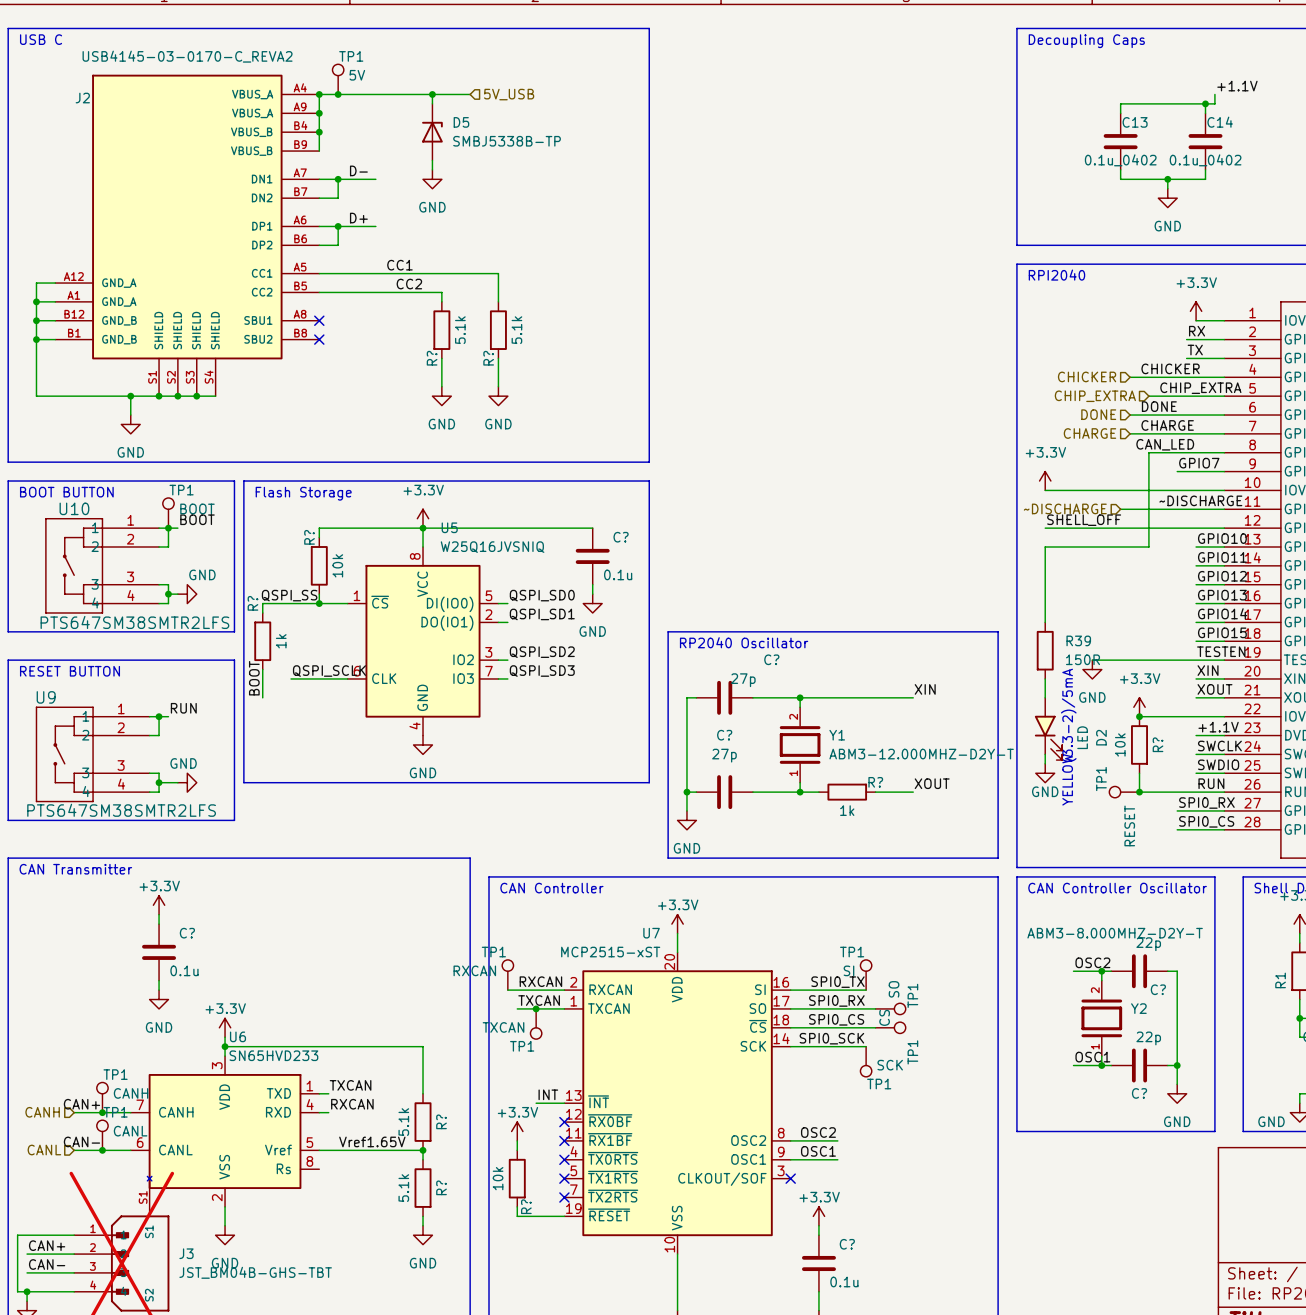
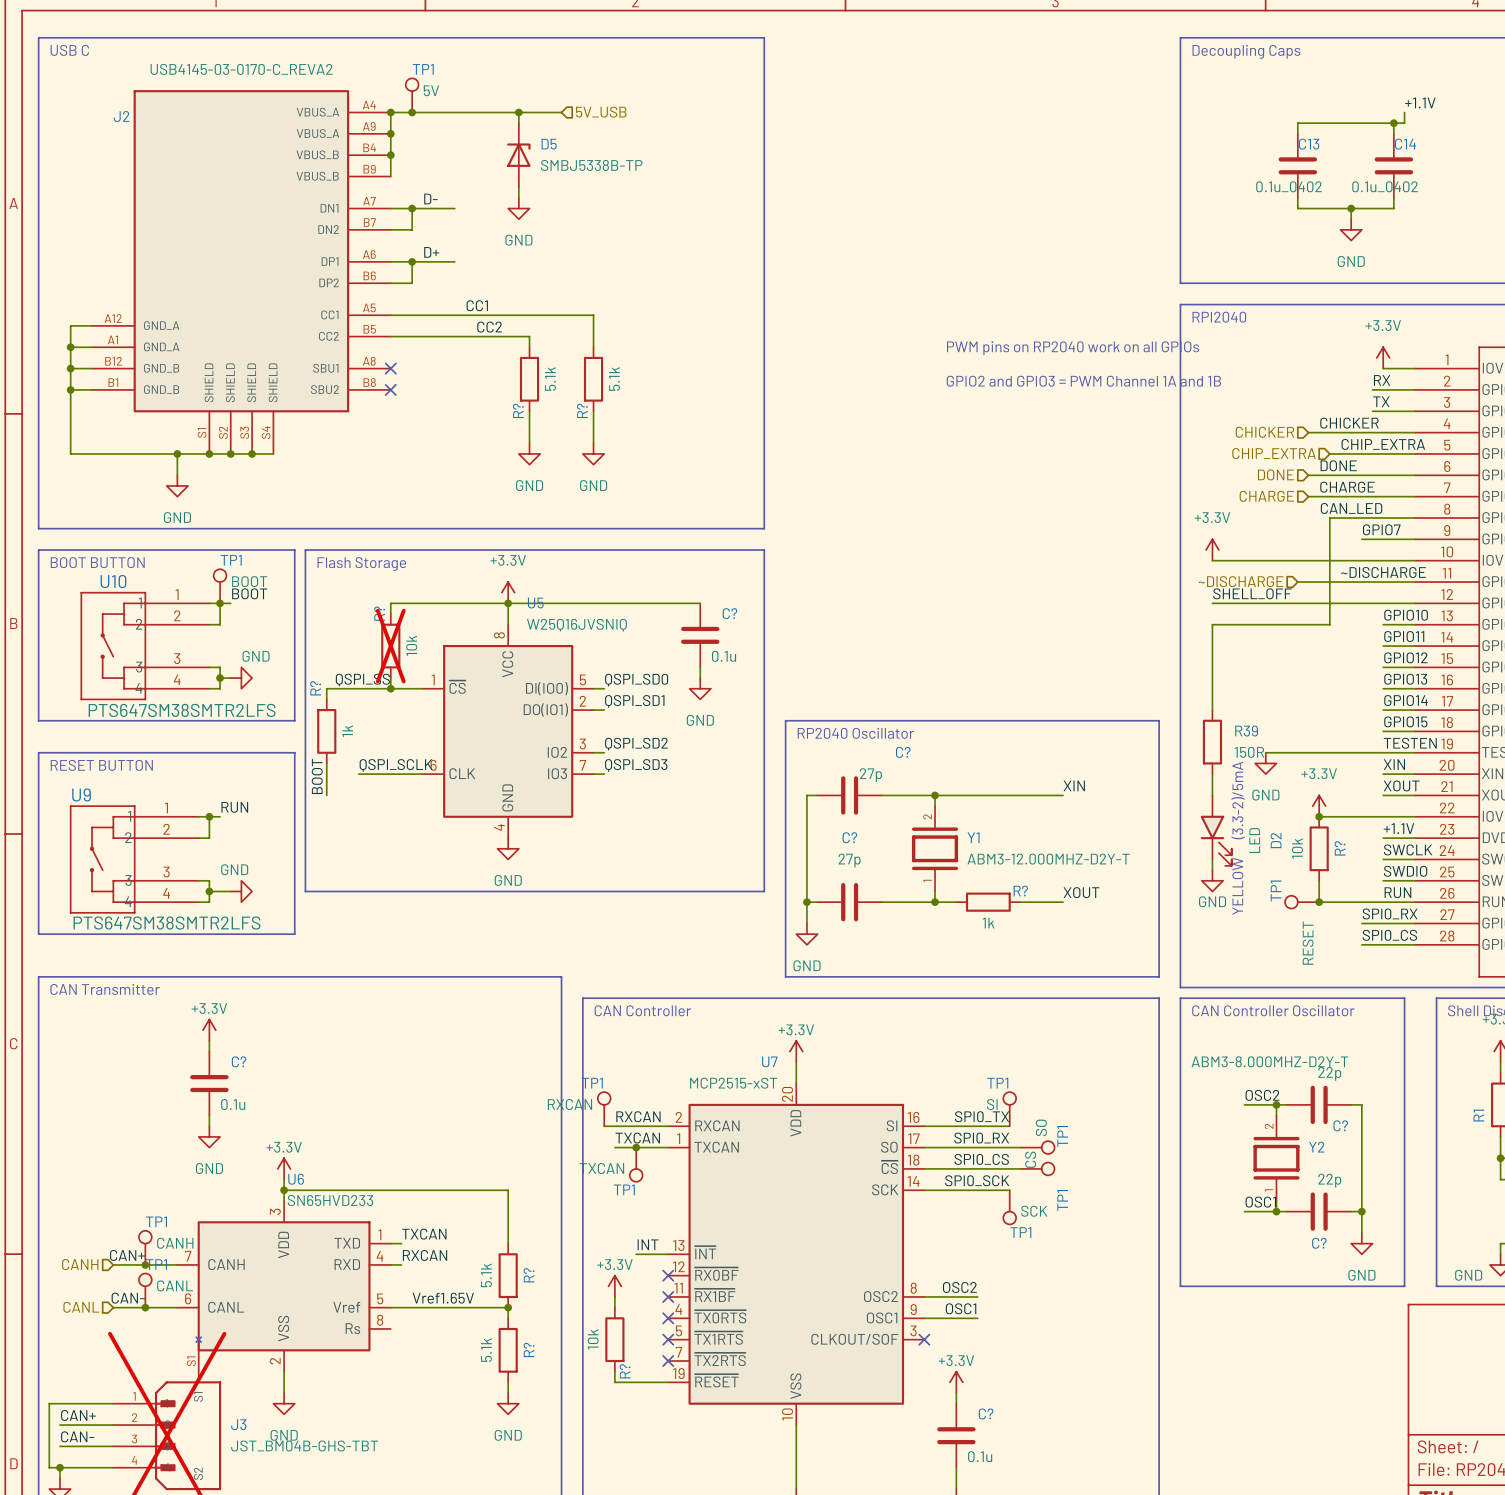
text: none -> PWM pins on RP2040 work on all GPIOs (1073, 348)
text: none -> GPIO2 and GPIO3 = PWM Channel 1A and 1B (1083, 381)
R? do-not-place cross: none -> (390, 646)

